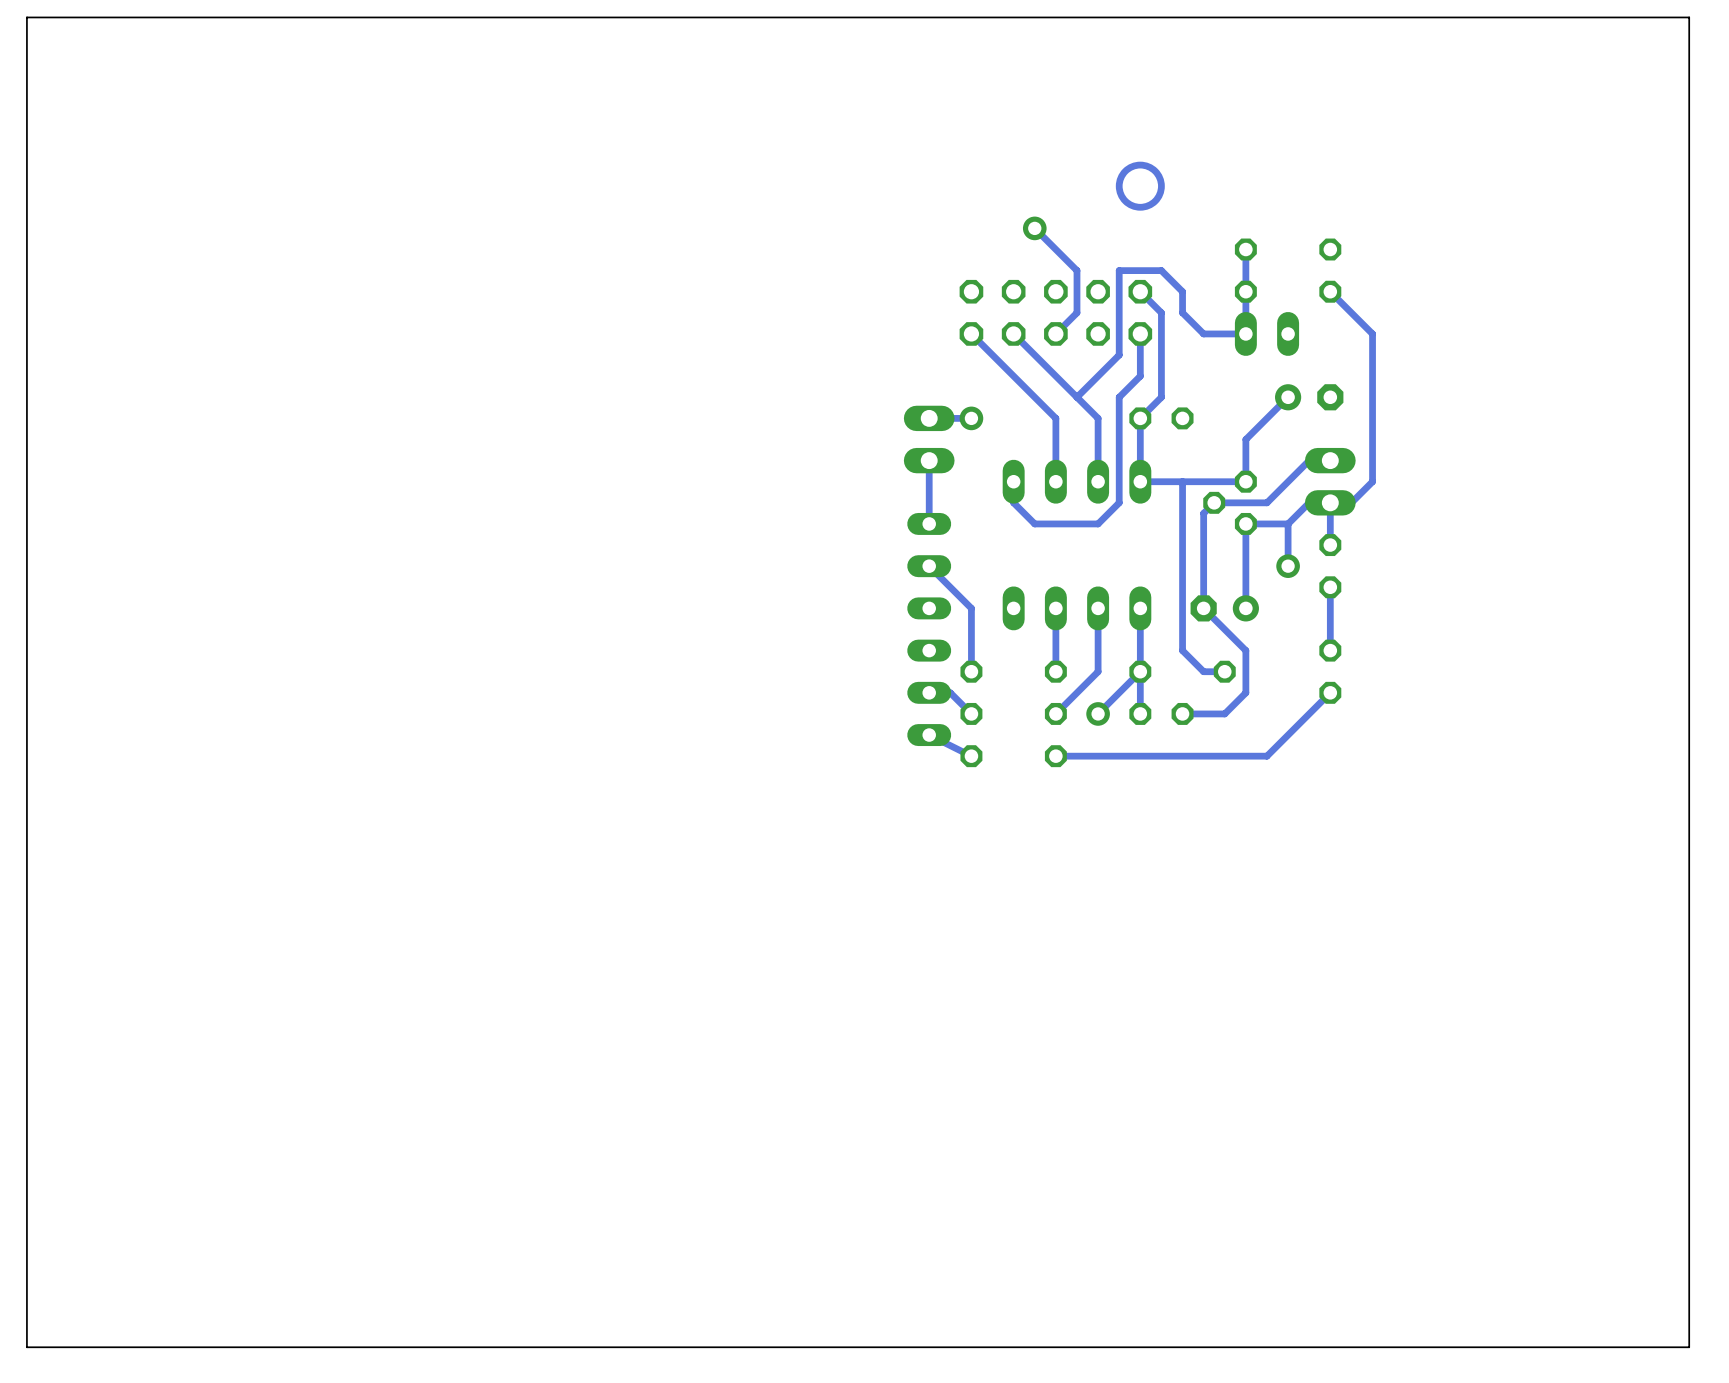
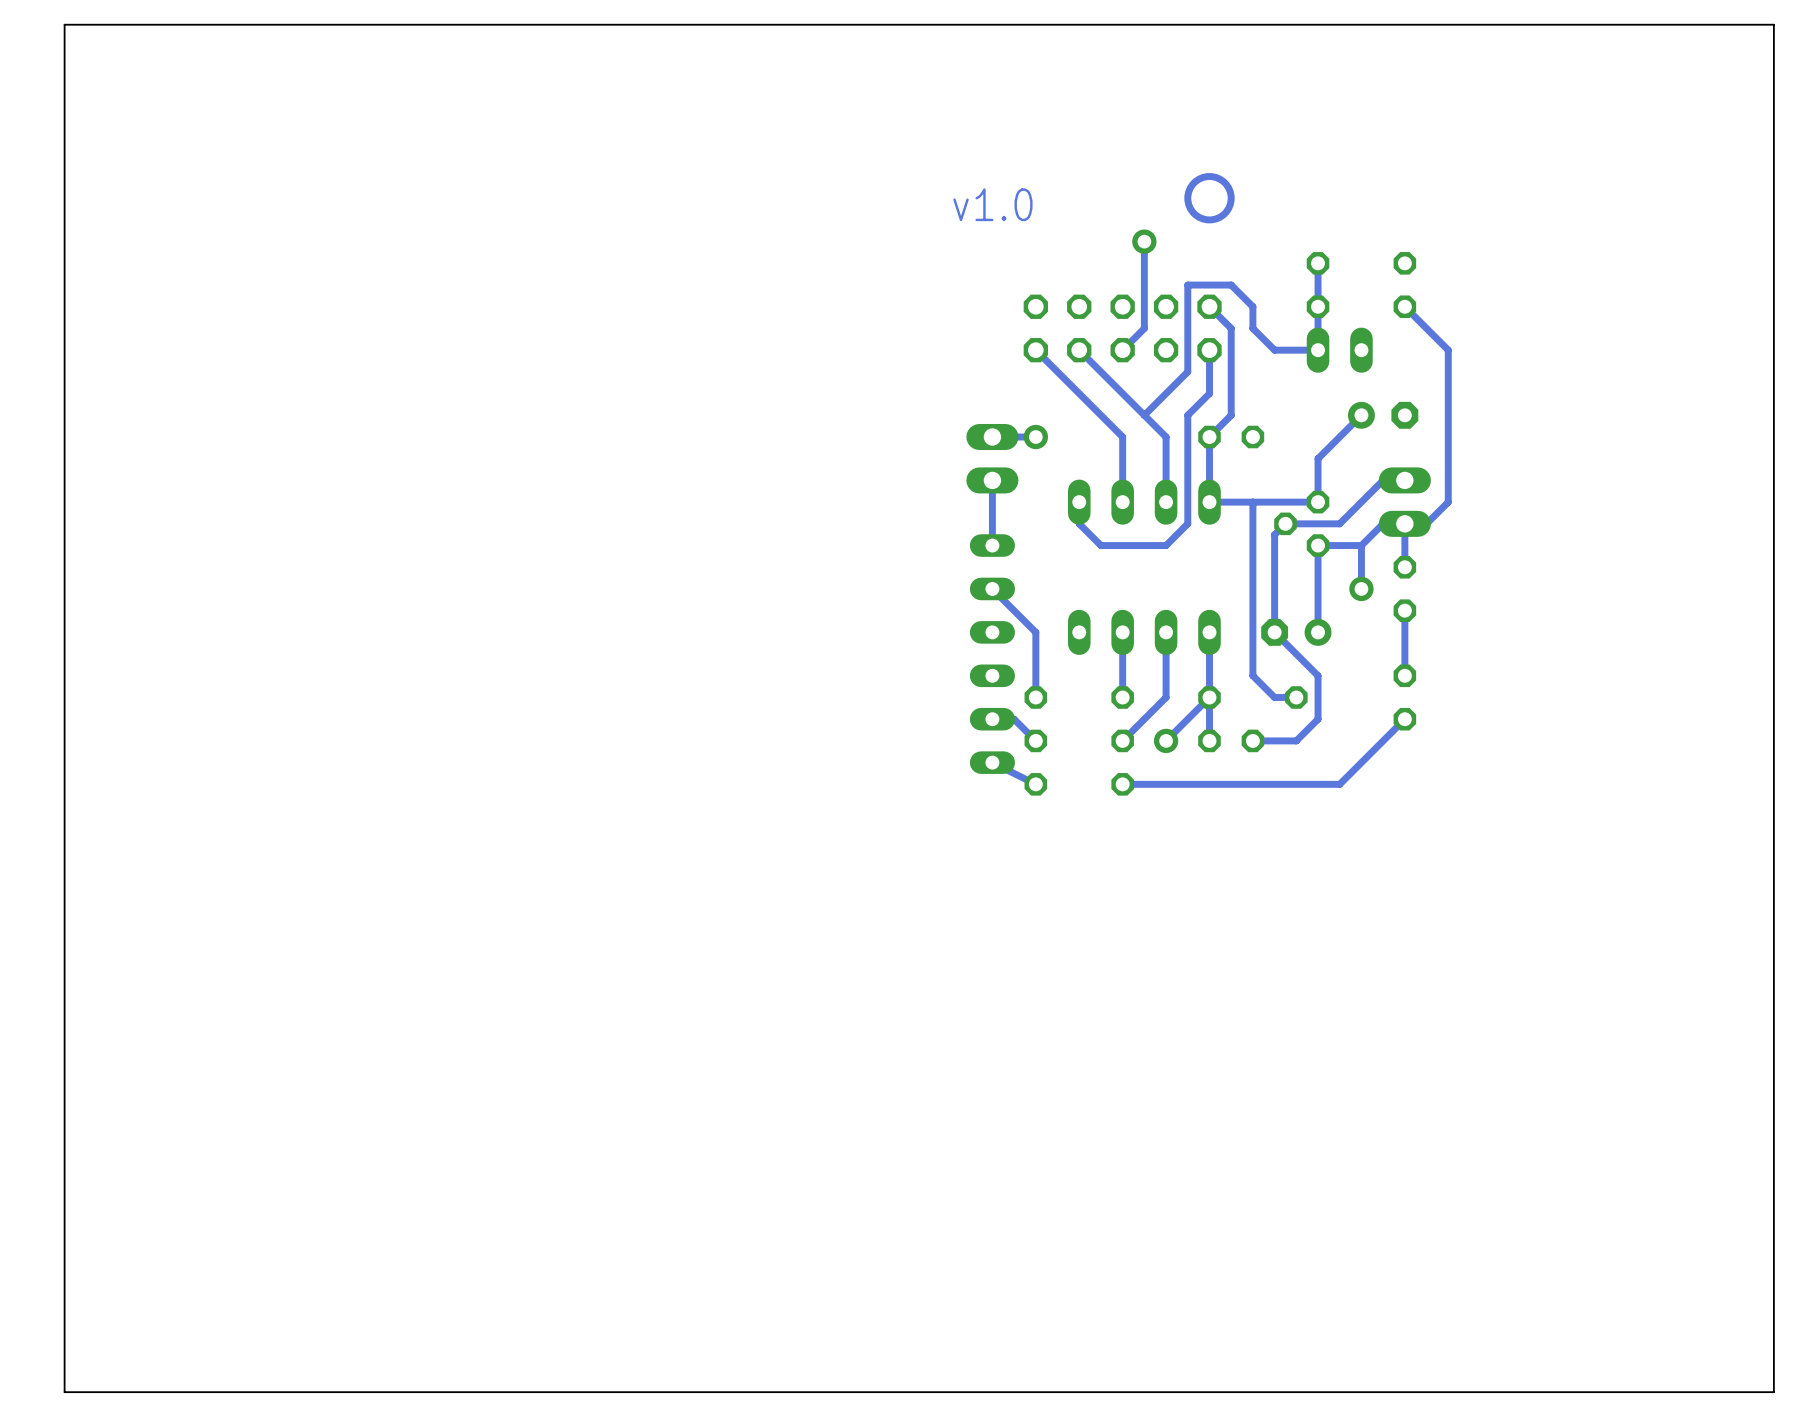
text: none -> v1.0 (992, 204)
track: (1034, 228) (1076, 270) -> (1144, 241) (1144, 285)
via position: (1034, 228) -> (1144, 241)

